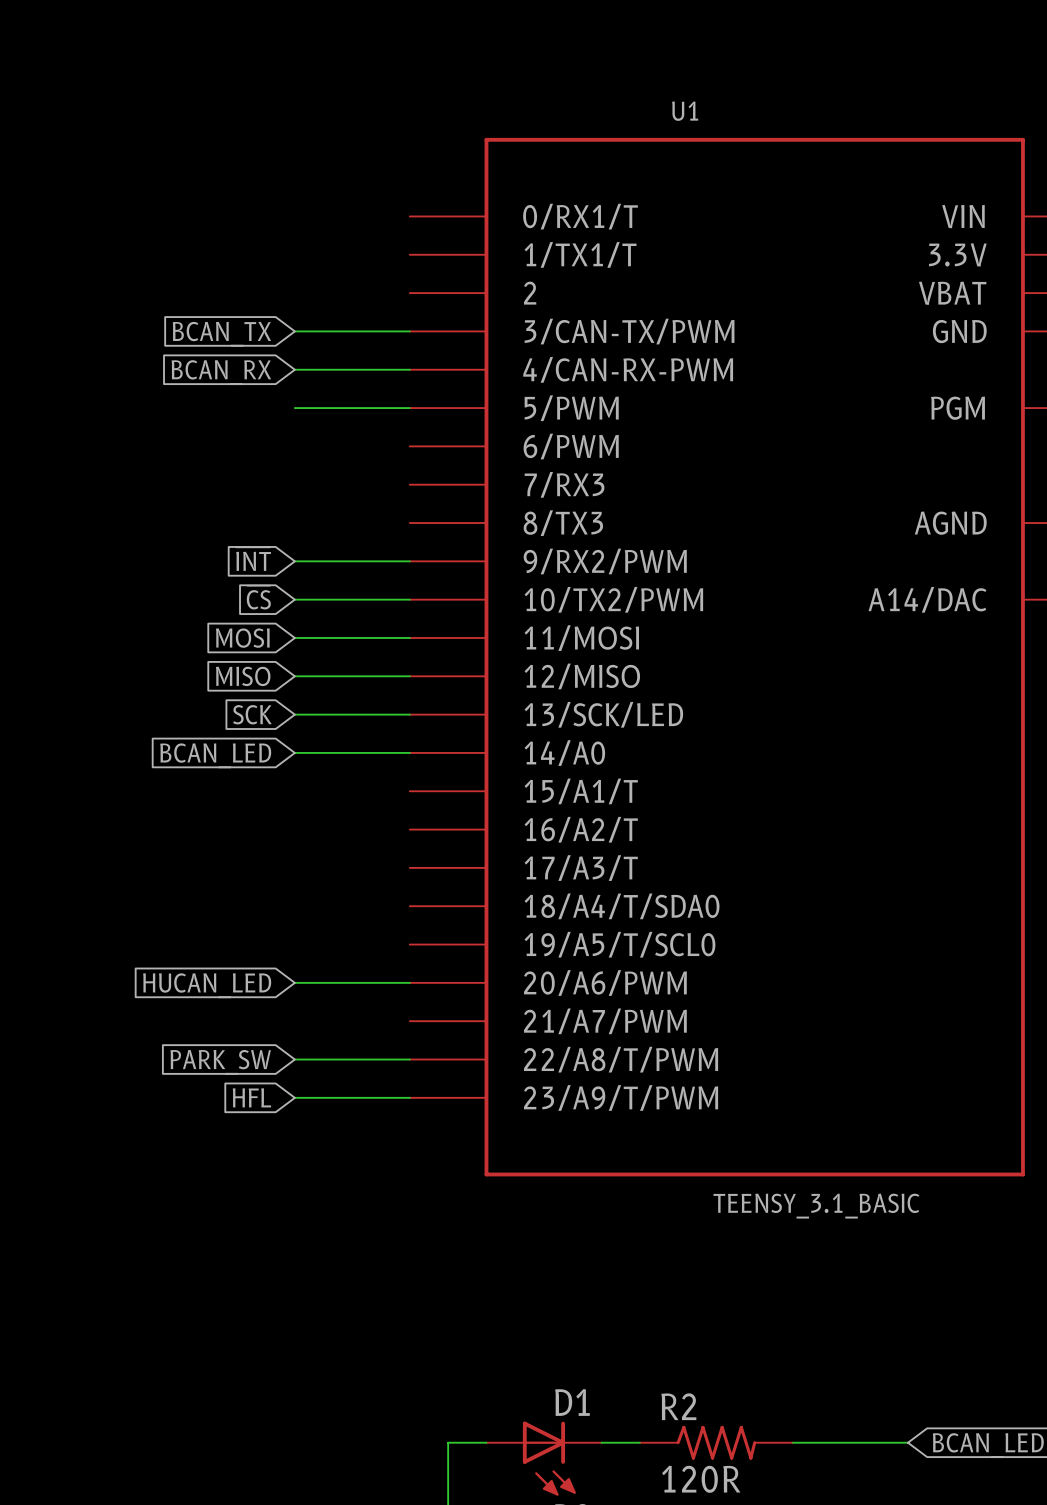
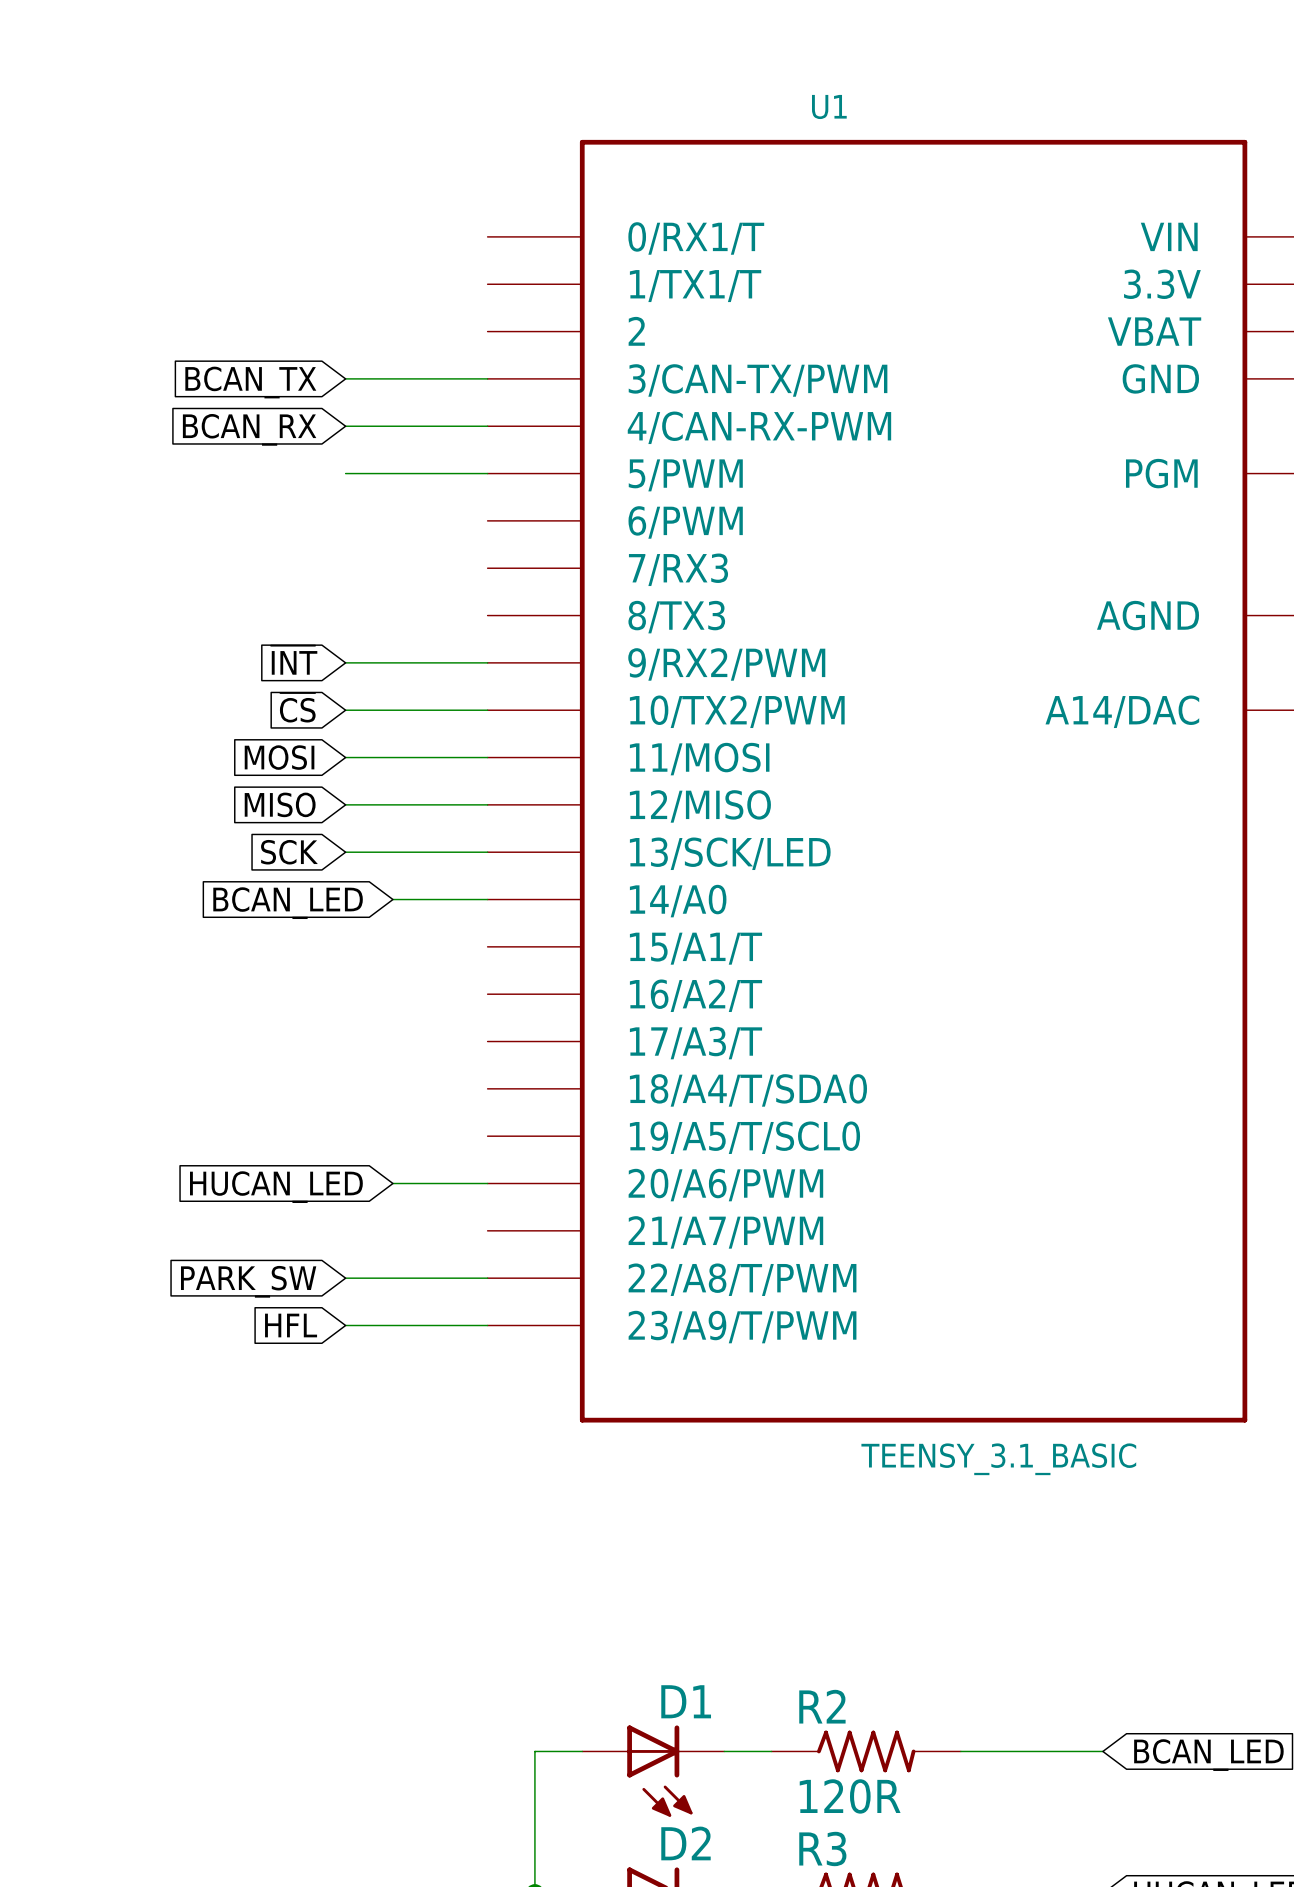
wire: (294, 752) (333, 752) -> none
global label position: BCAN_LED (215, 755) -> BCAN_LED (288, 903)
wire: (294, 982) (333, 982) -> none
global label position: HUCAN_LED (207, 985) -> HUCAN_LED (276, 1187)

